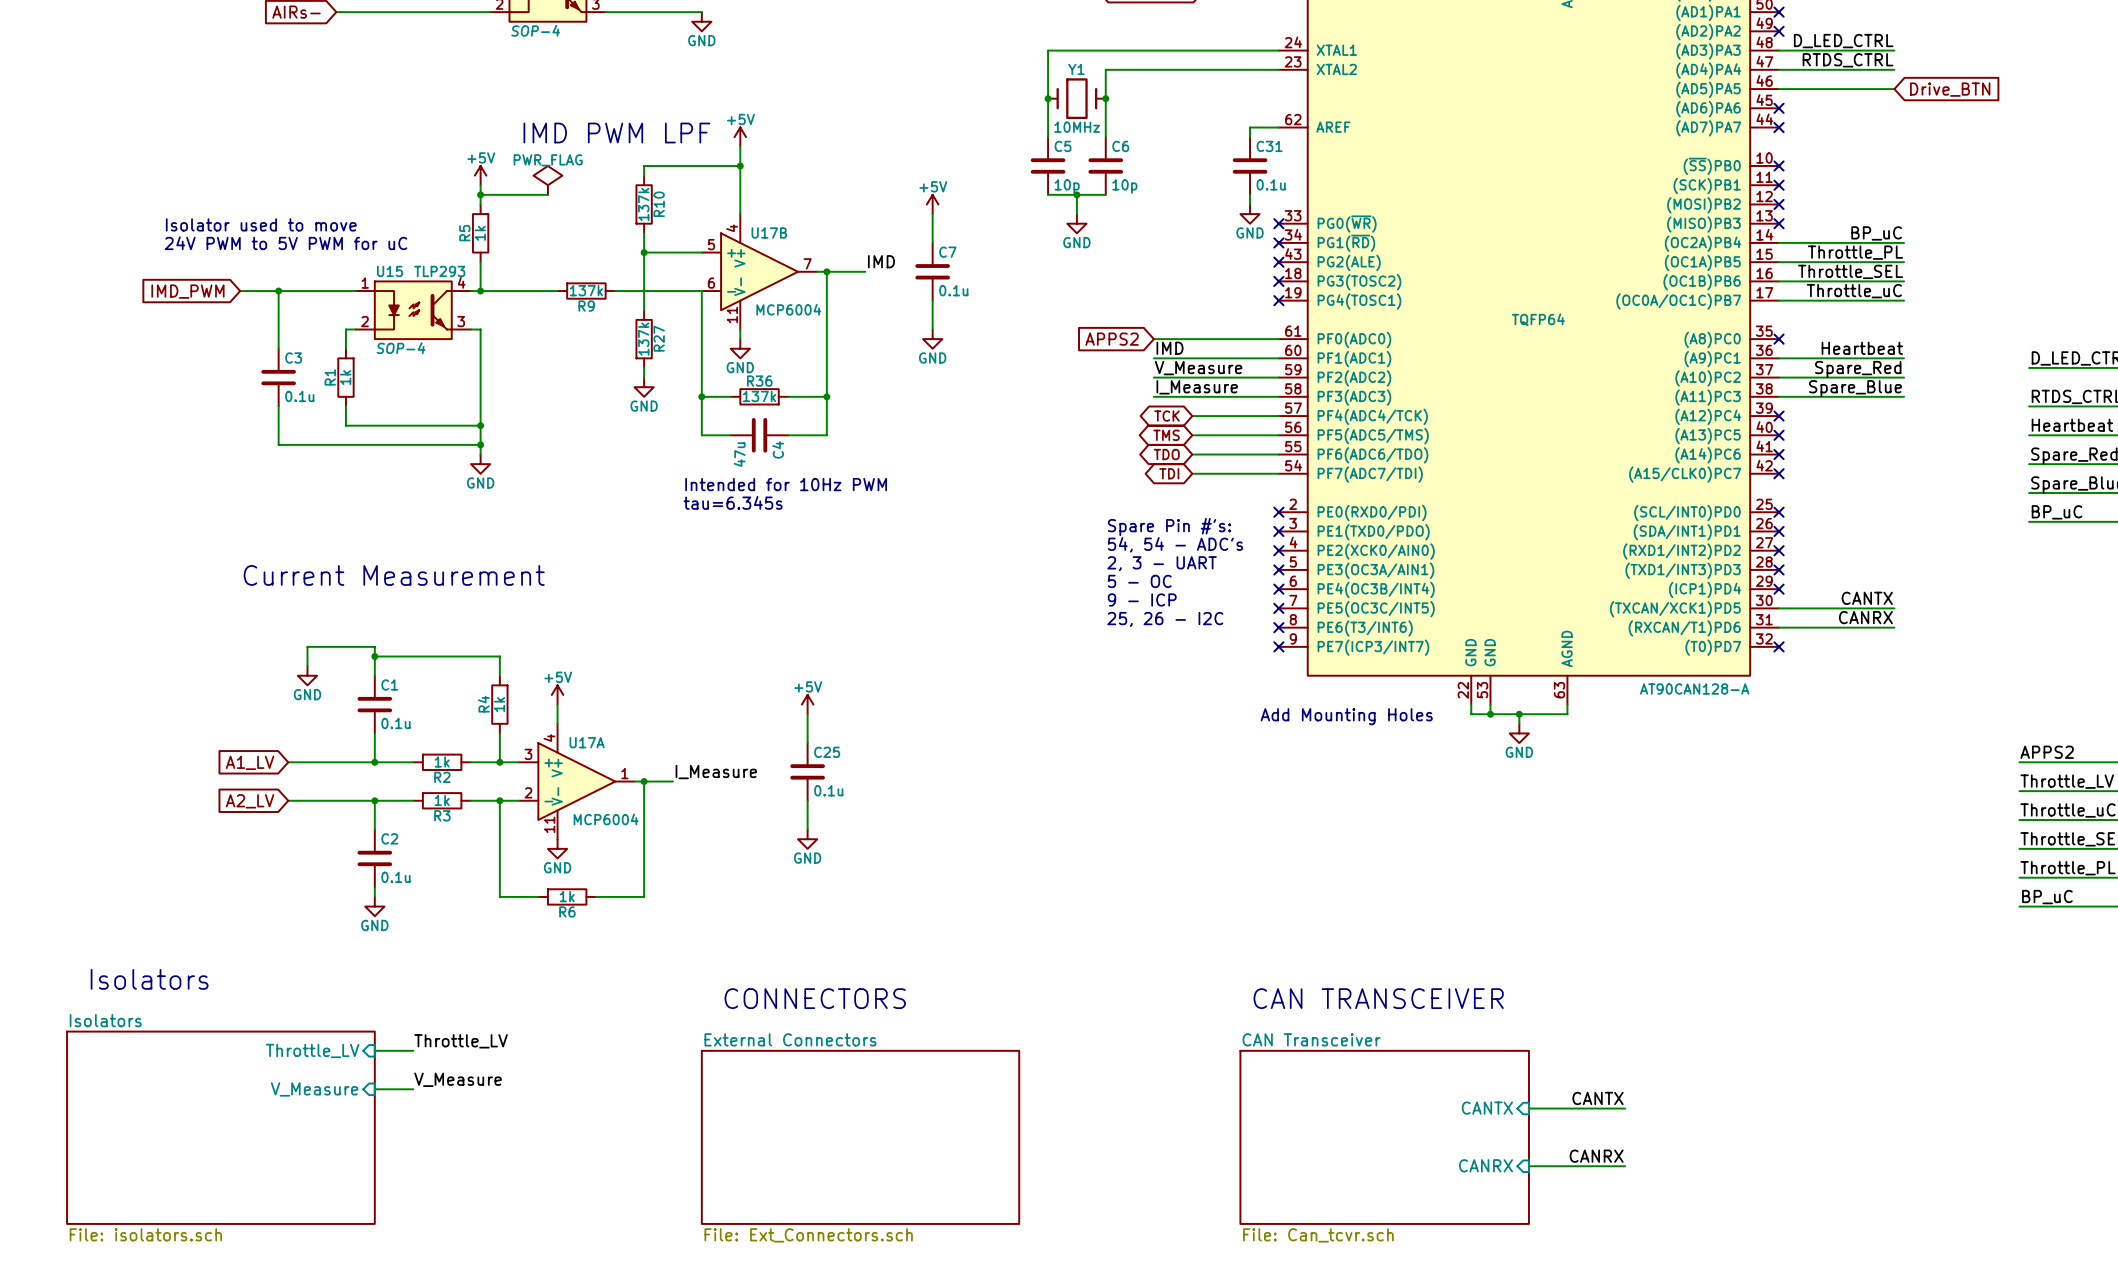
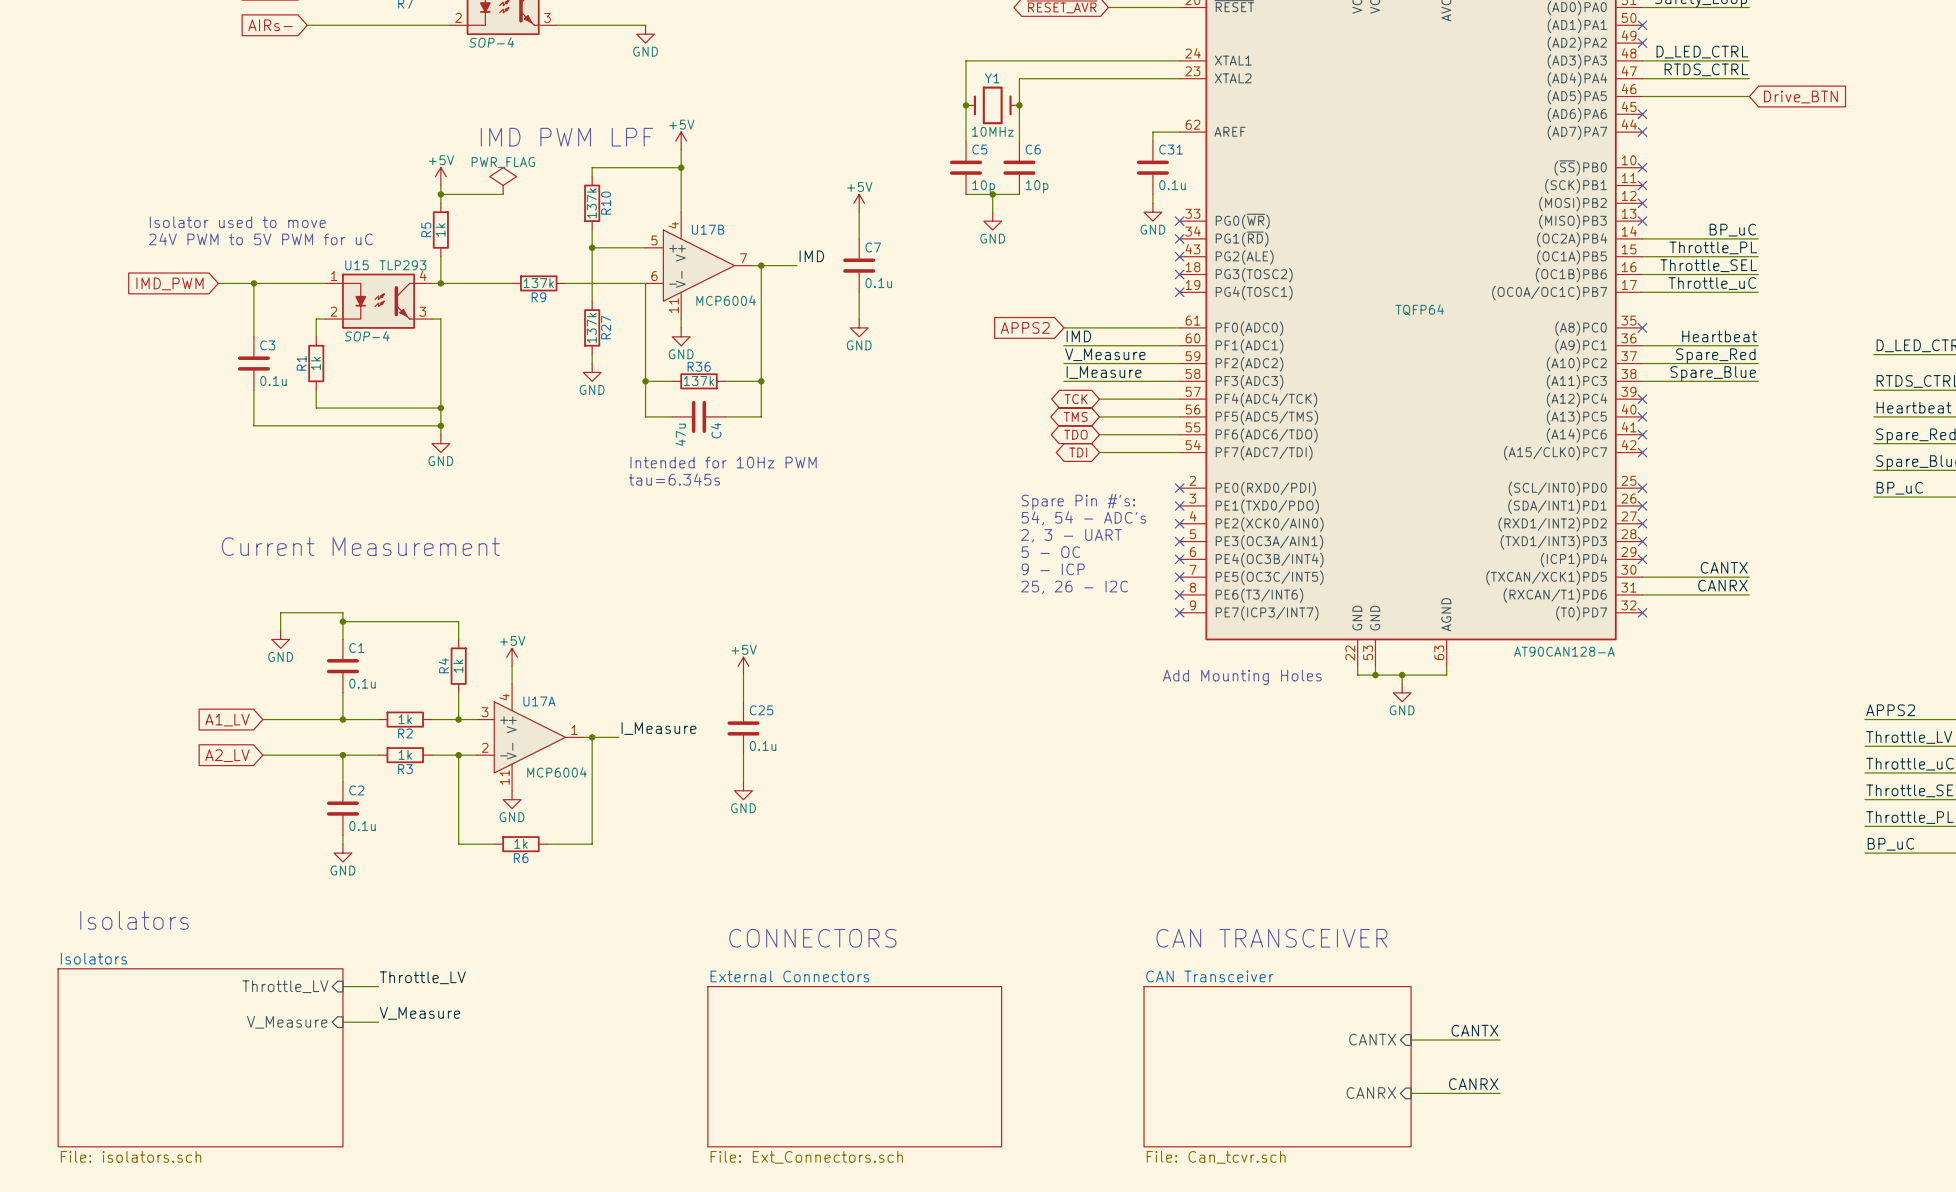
text position: CONNECTORS (815, 998) -> CONNECTORS (812, 938)
sheet External Connectors position: (860, 1137) -> (854, 1066)

